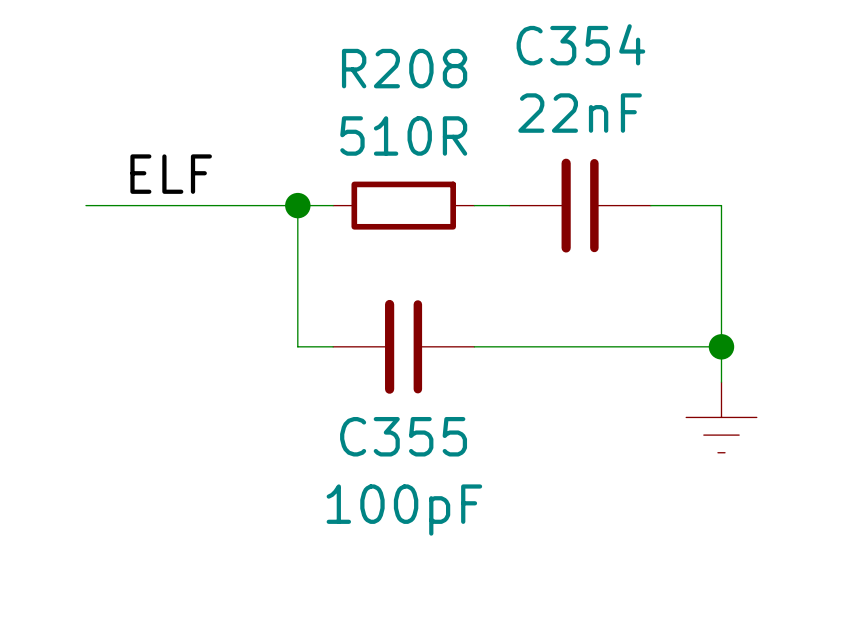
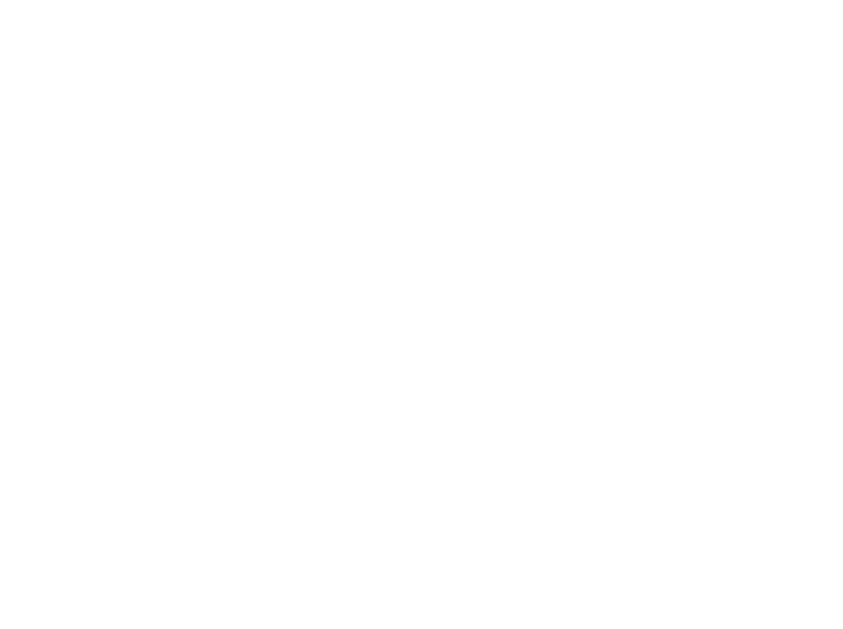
label: ELF (171, 174) -> none
wire: (85, 205) (333, 205) -> none
wire: (297, 205) (297, 346) (333, 346) -> none
junction: (297, 205) -> none
R208: 510R (403, 205) -> none
wire: (474, 205) (509, 205) -> none
C354: 22nF (580, 205) -> none
wire: (650, 205) (721, 205) (721, 382) -> none
C355: 100pF (403, 346) -> none
wire: (474, 346) (721, 346) -> none
junction: (721, 346) -> none
power symbol: (721, 417) -> none

